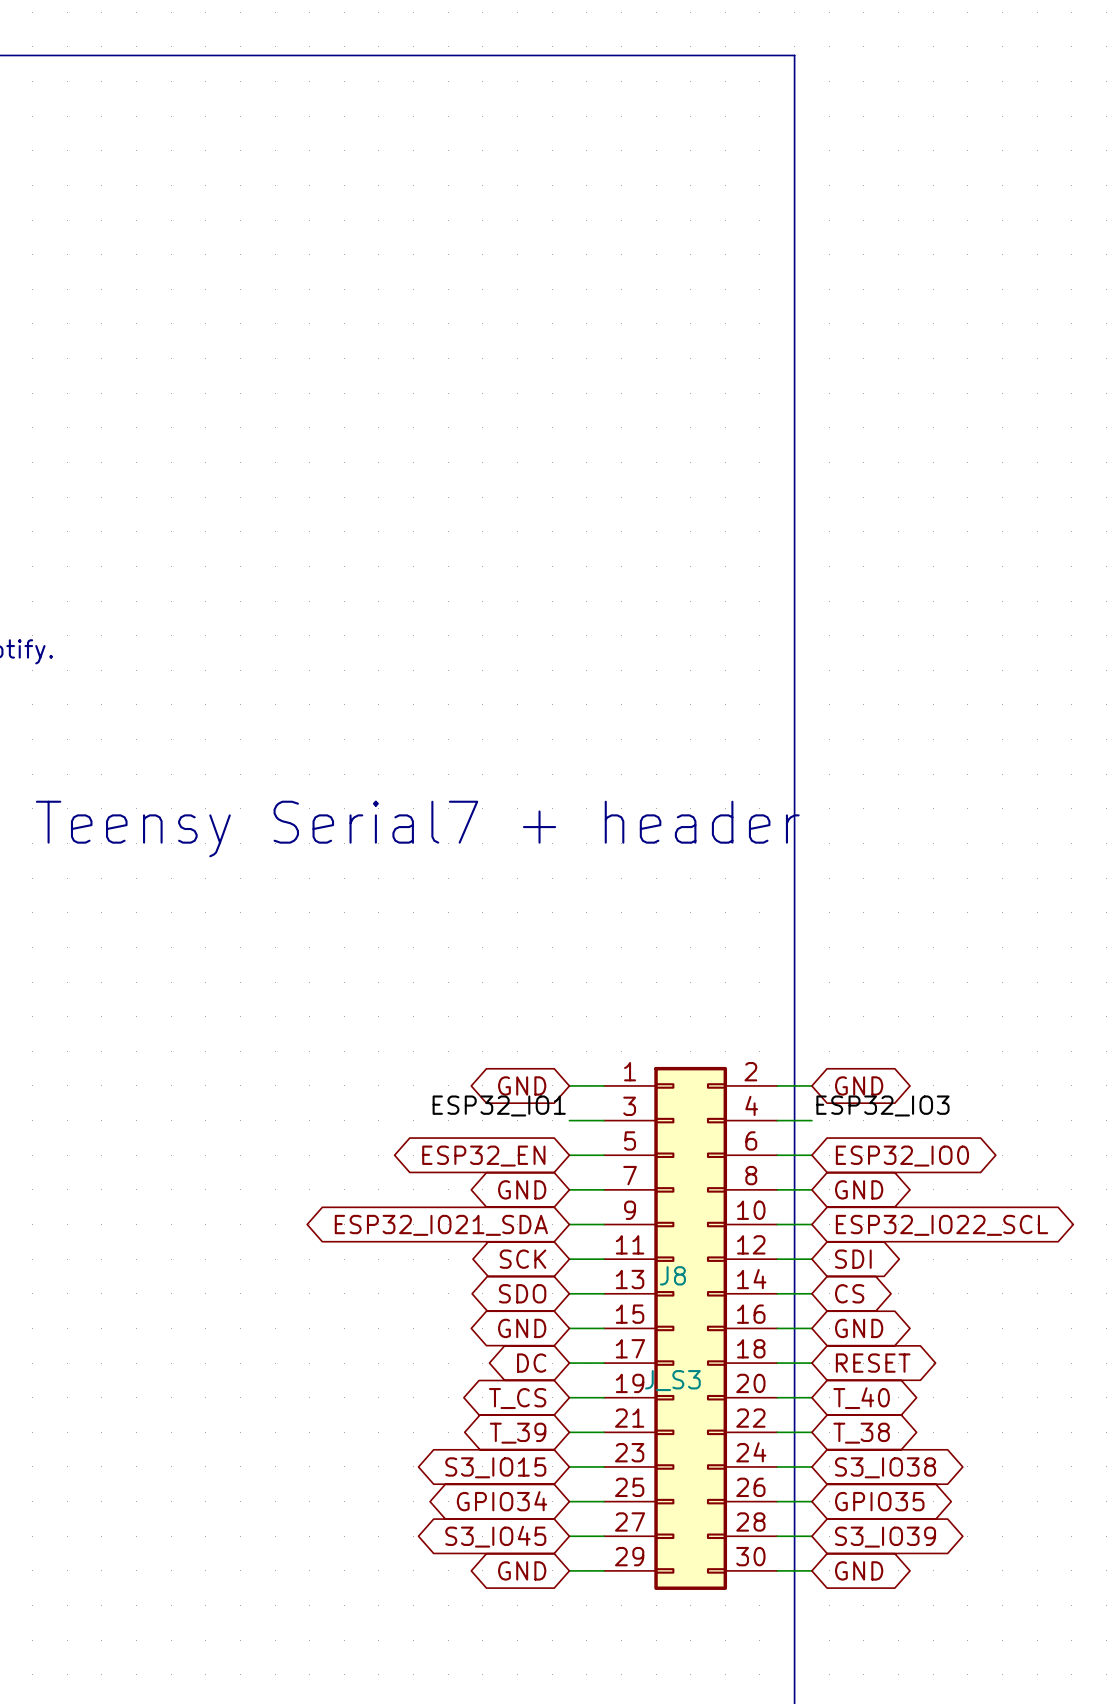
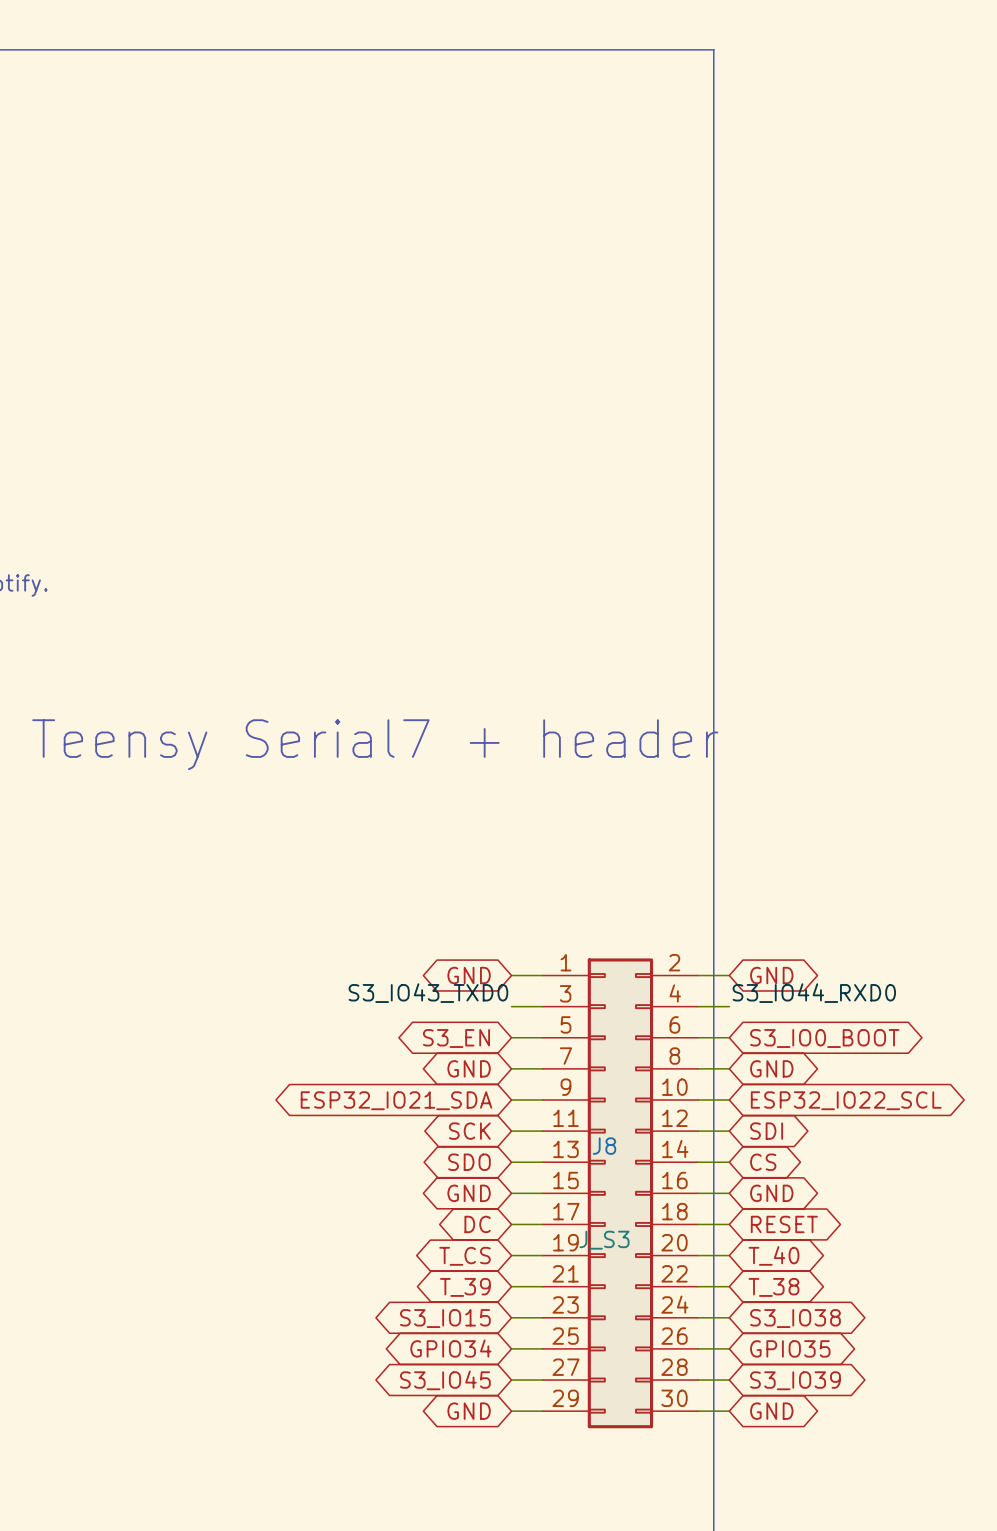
label: ESP32_IO1 (499, 1105) -> S3_IO43_TXD0 (428, 993)
label: ESP32_IO3 (882, 1105) -> S3_IO44_RXD0 (814, 993)
global label: ESP32_EN (483, 1156) -> S3_EN (456, 1038)
global label: ESP32_IO0 (902, 1156) -> S3_IO0_BOOT (824, 1038)

